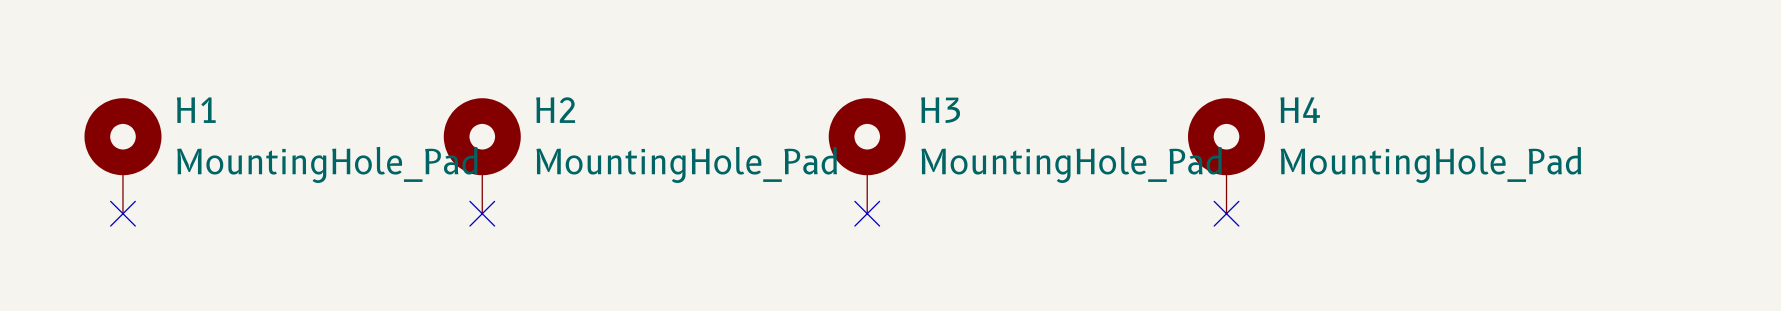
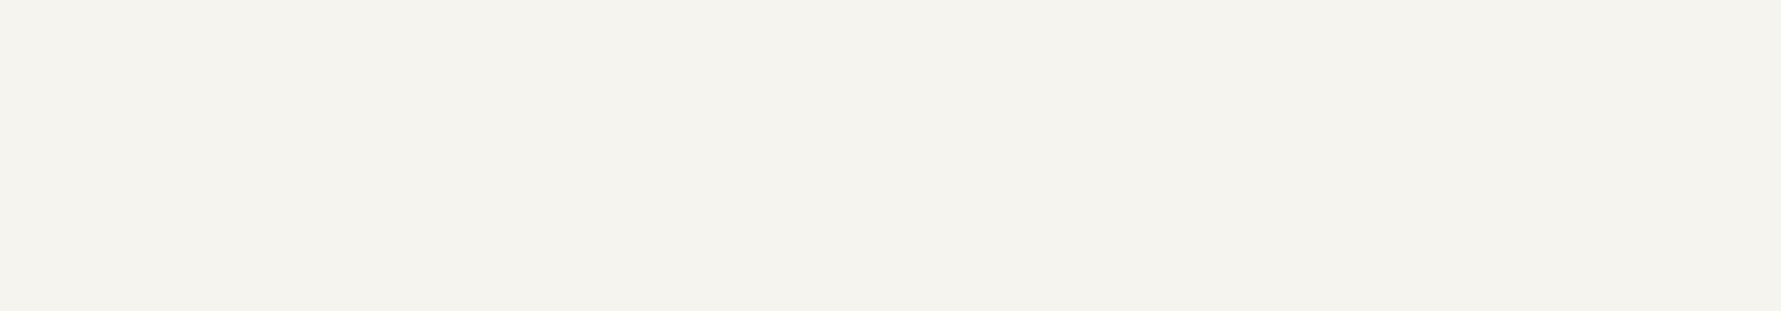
H1: MountingHole_Pad (122, 155) -> none
H2: MountingHole_Pad (482, 155) -> none
H3: MountingHole_Pad (867, 155) -> none
H4: MountingHole_Pad (1226, 155) -> none
no-connect mark: (122, 213) -> none
no-connect mark: (482, 213) -> none
no-connect mark: (867, 213) -> none
no-connect mark: (1226, 213) -> none

